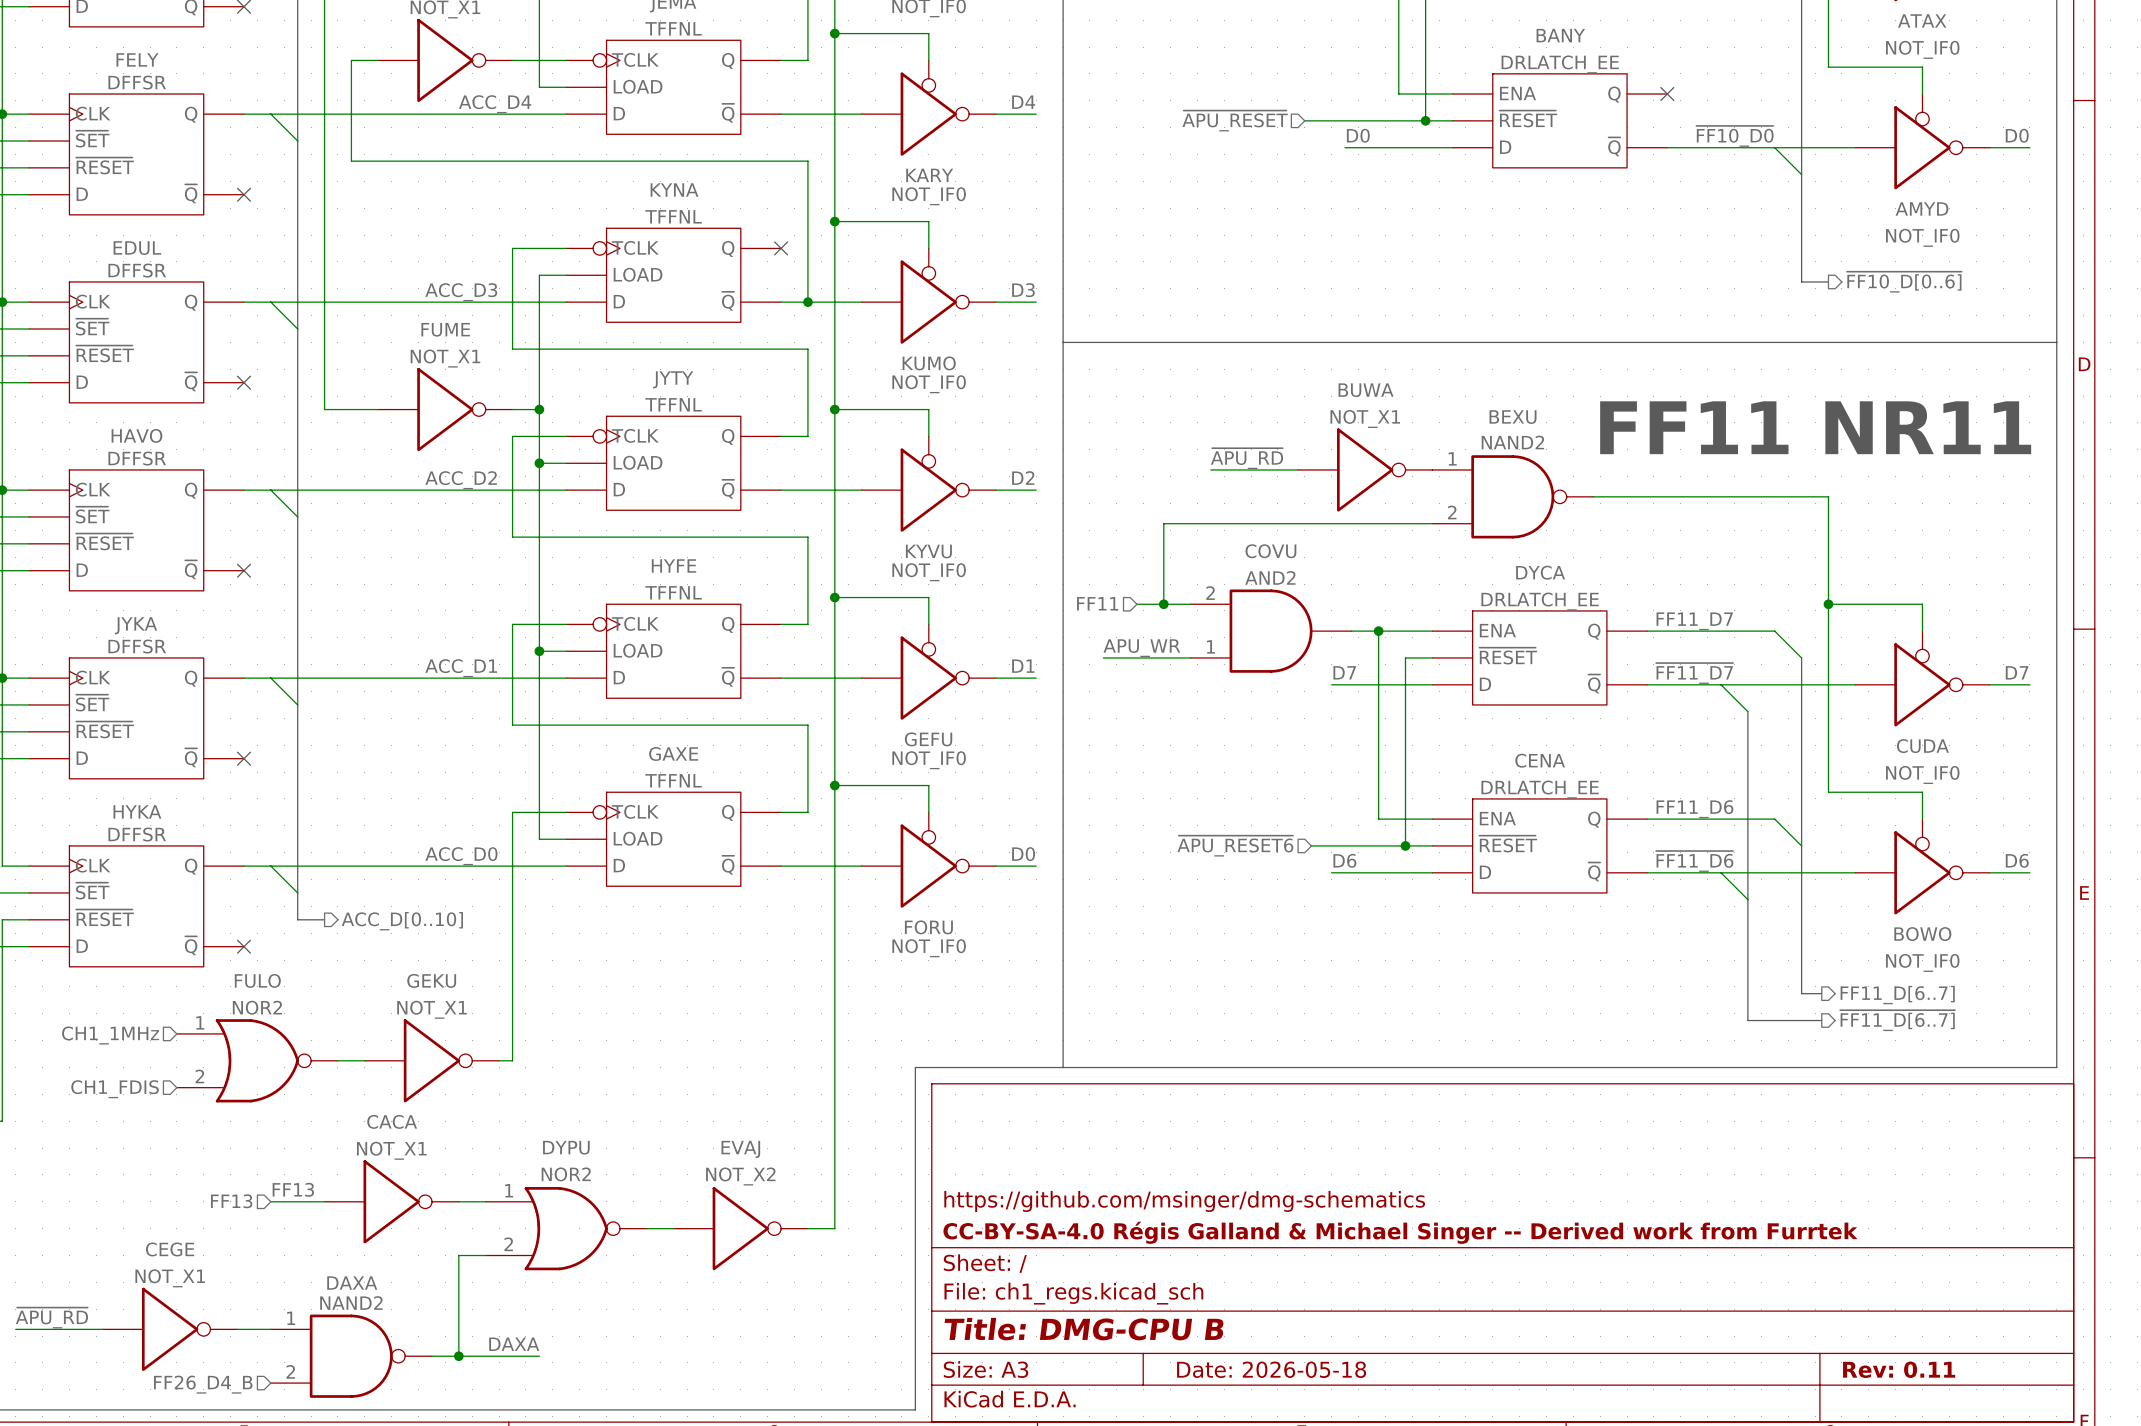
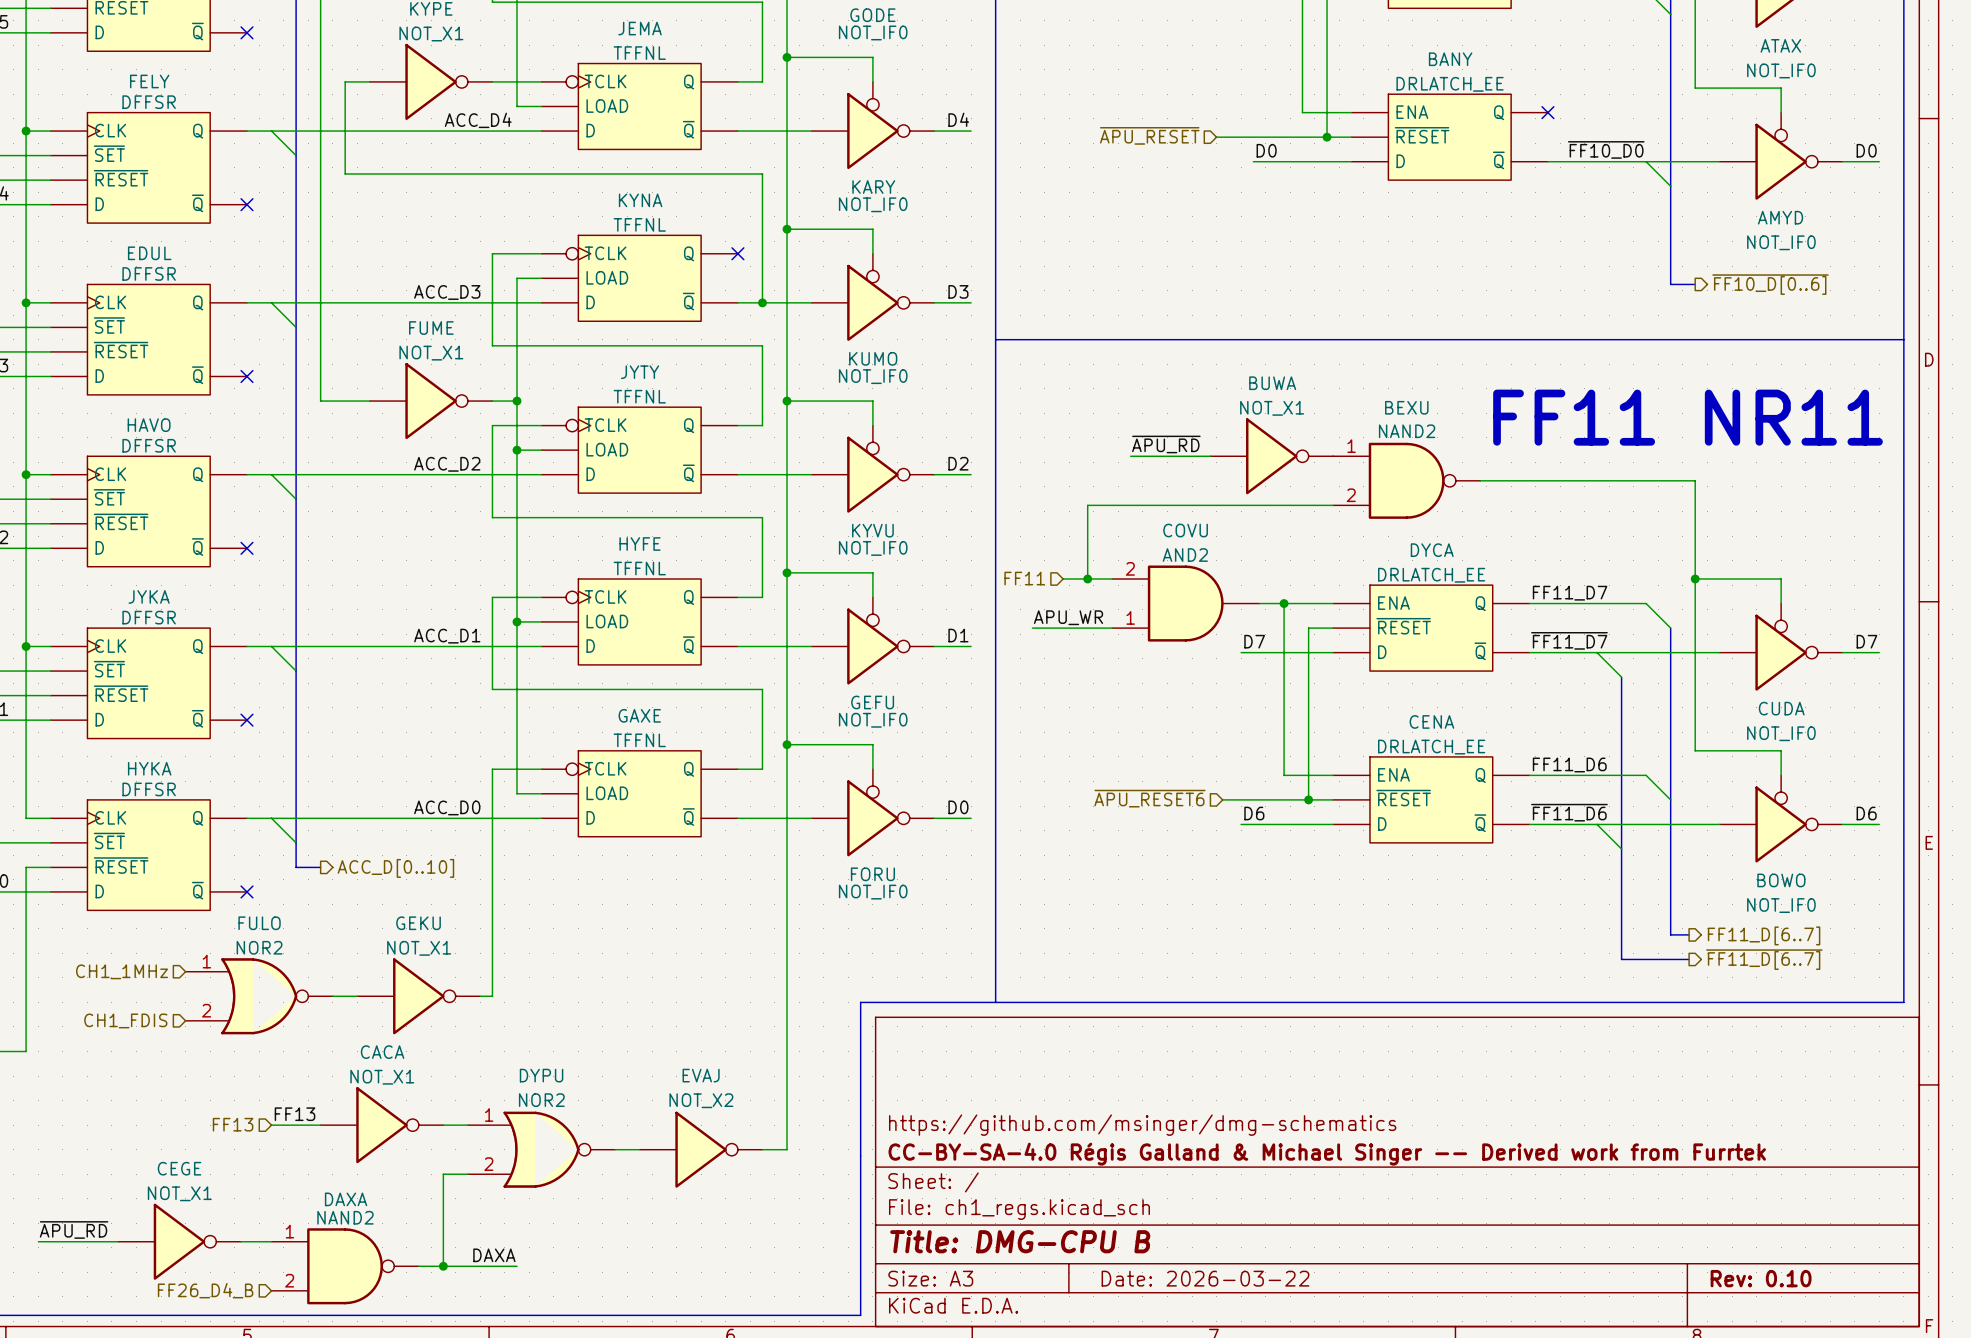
title block: Date: 2026-05-18 (1271, 1369) -> Date: 2026-03-22 (1205, 1278)
title block: Rev: 0.11 (1899, 1369) -> Rev: 0.10 (1761, 1278)

